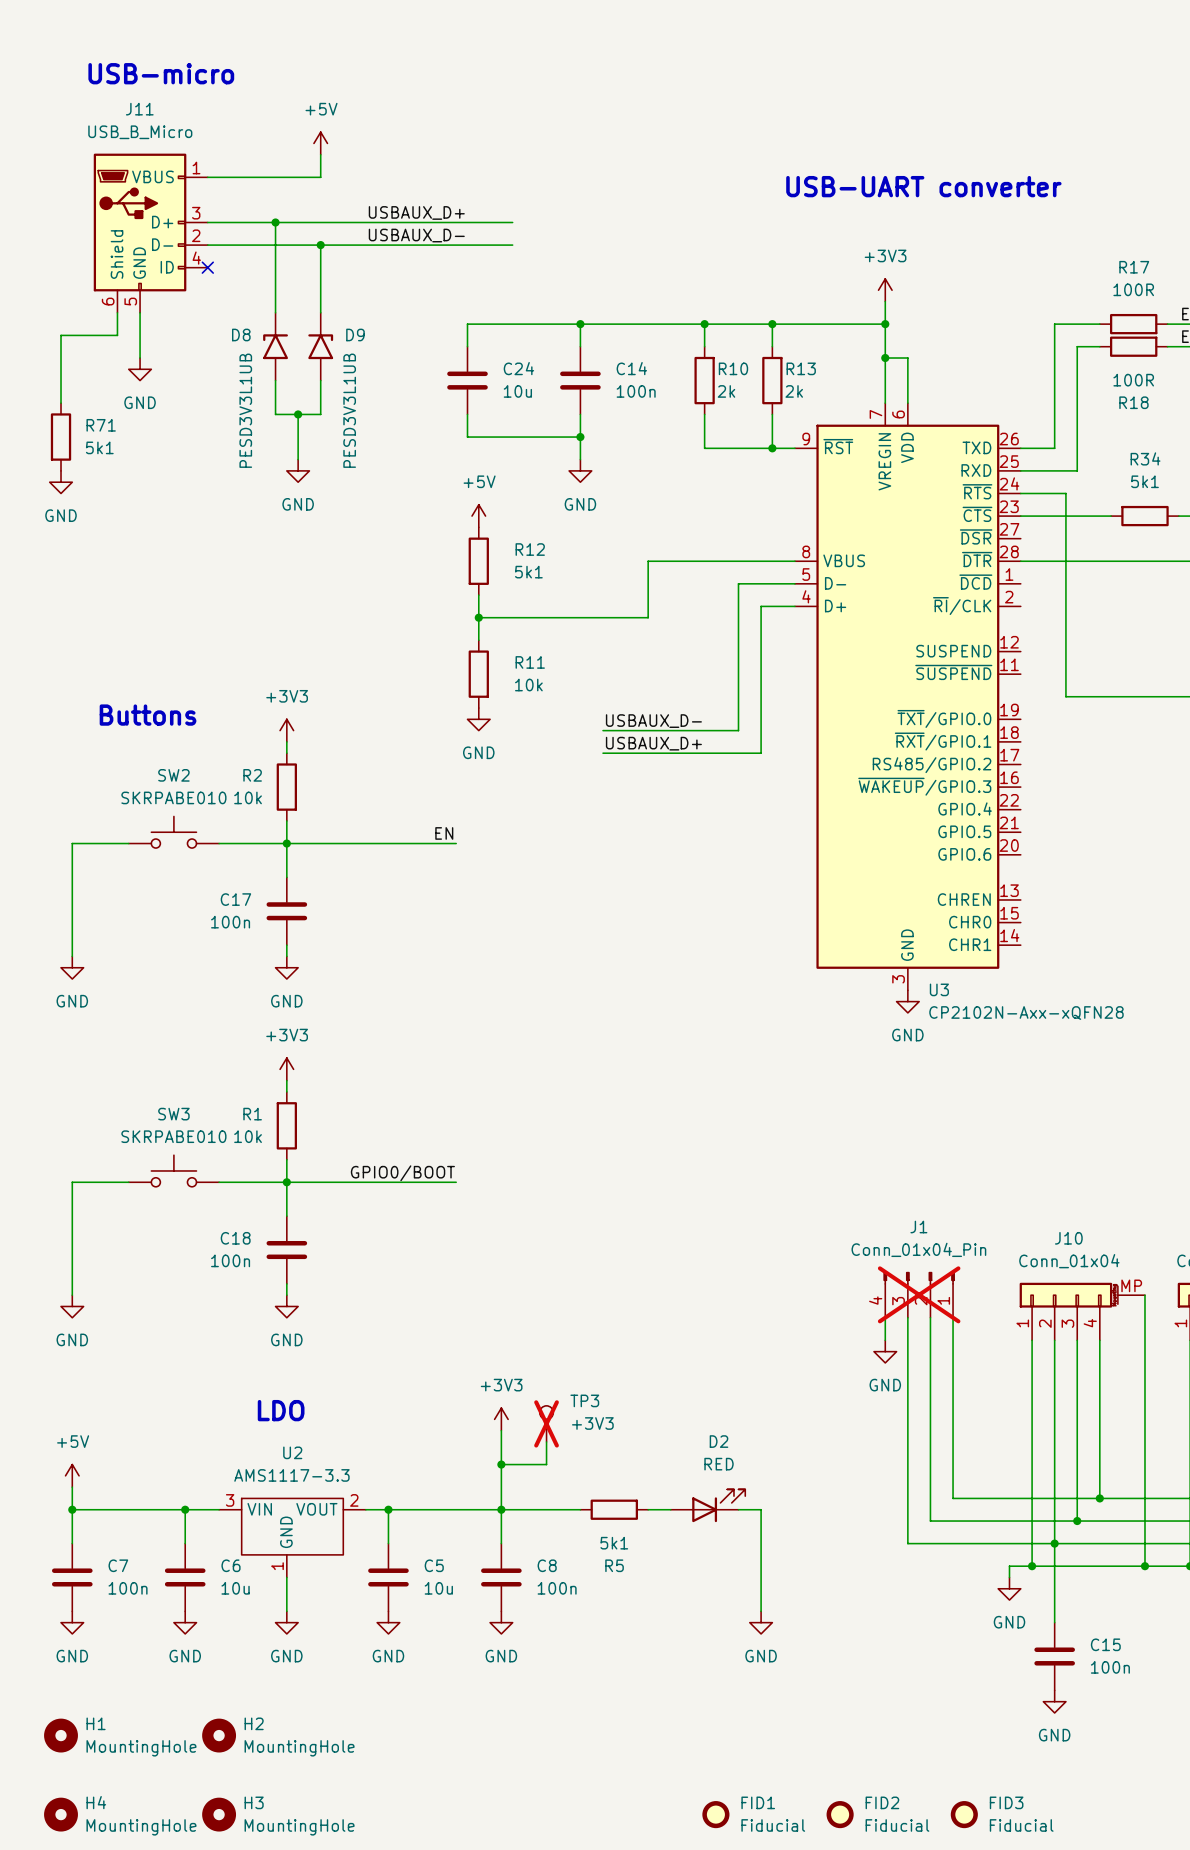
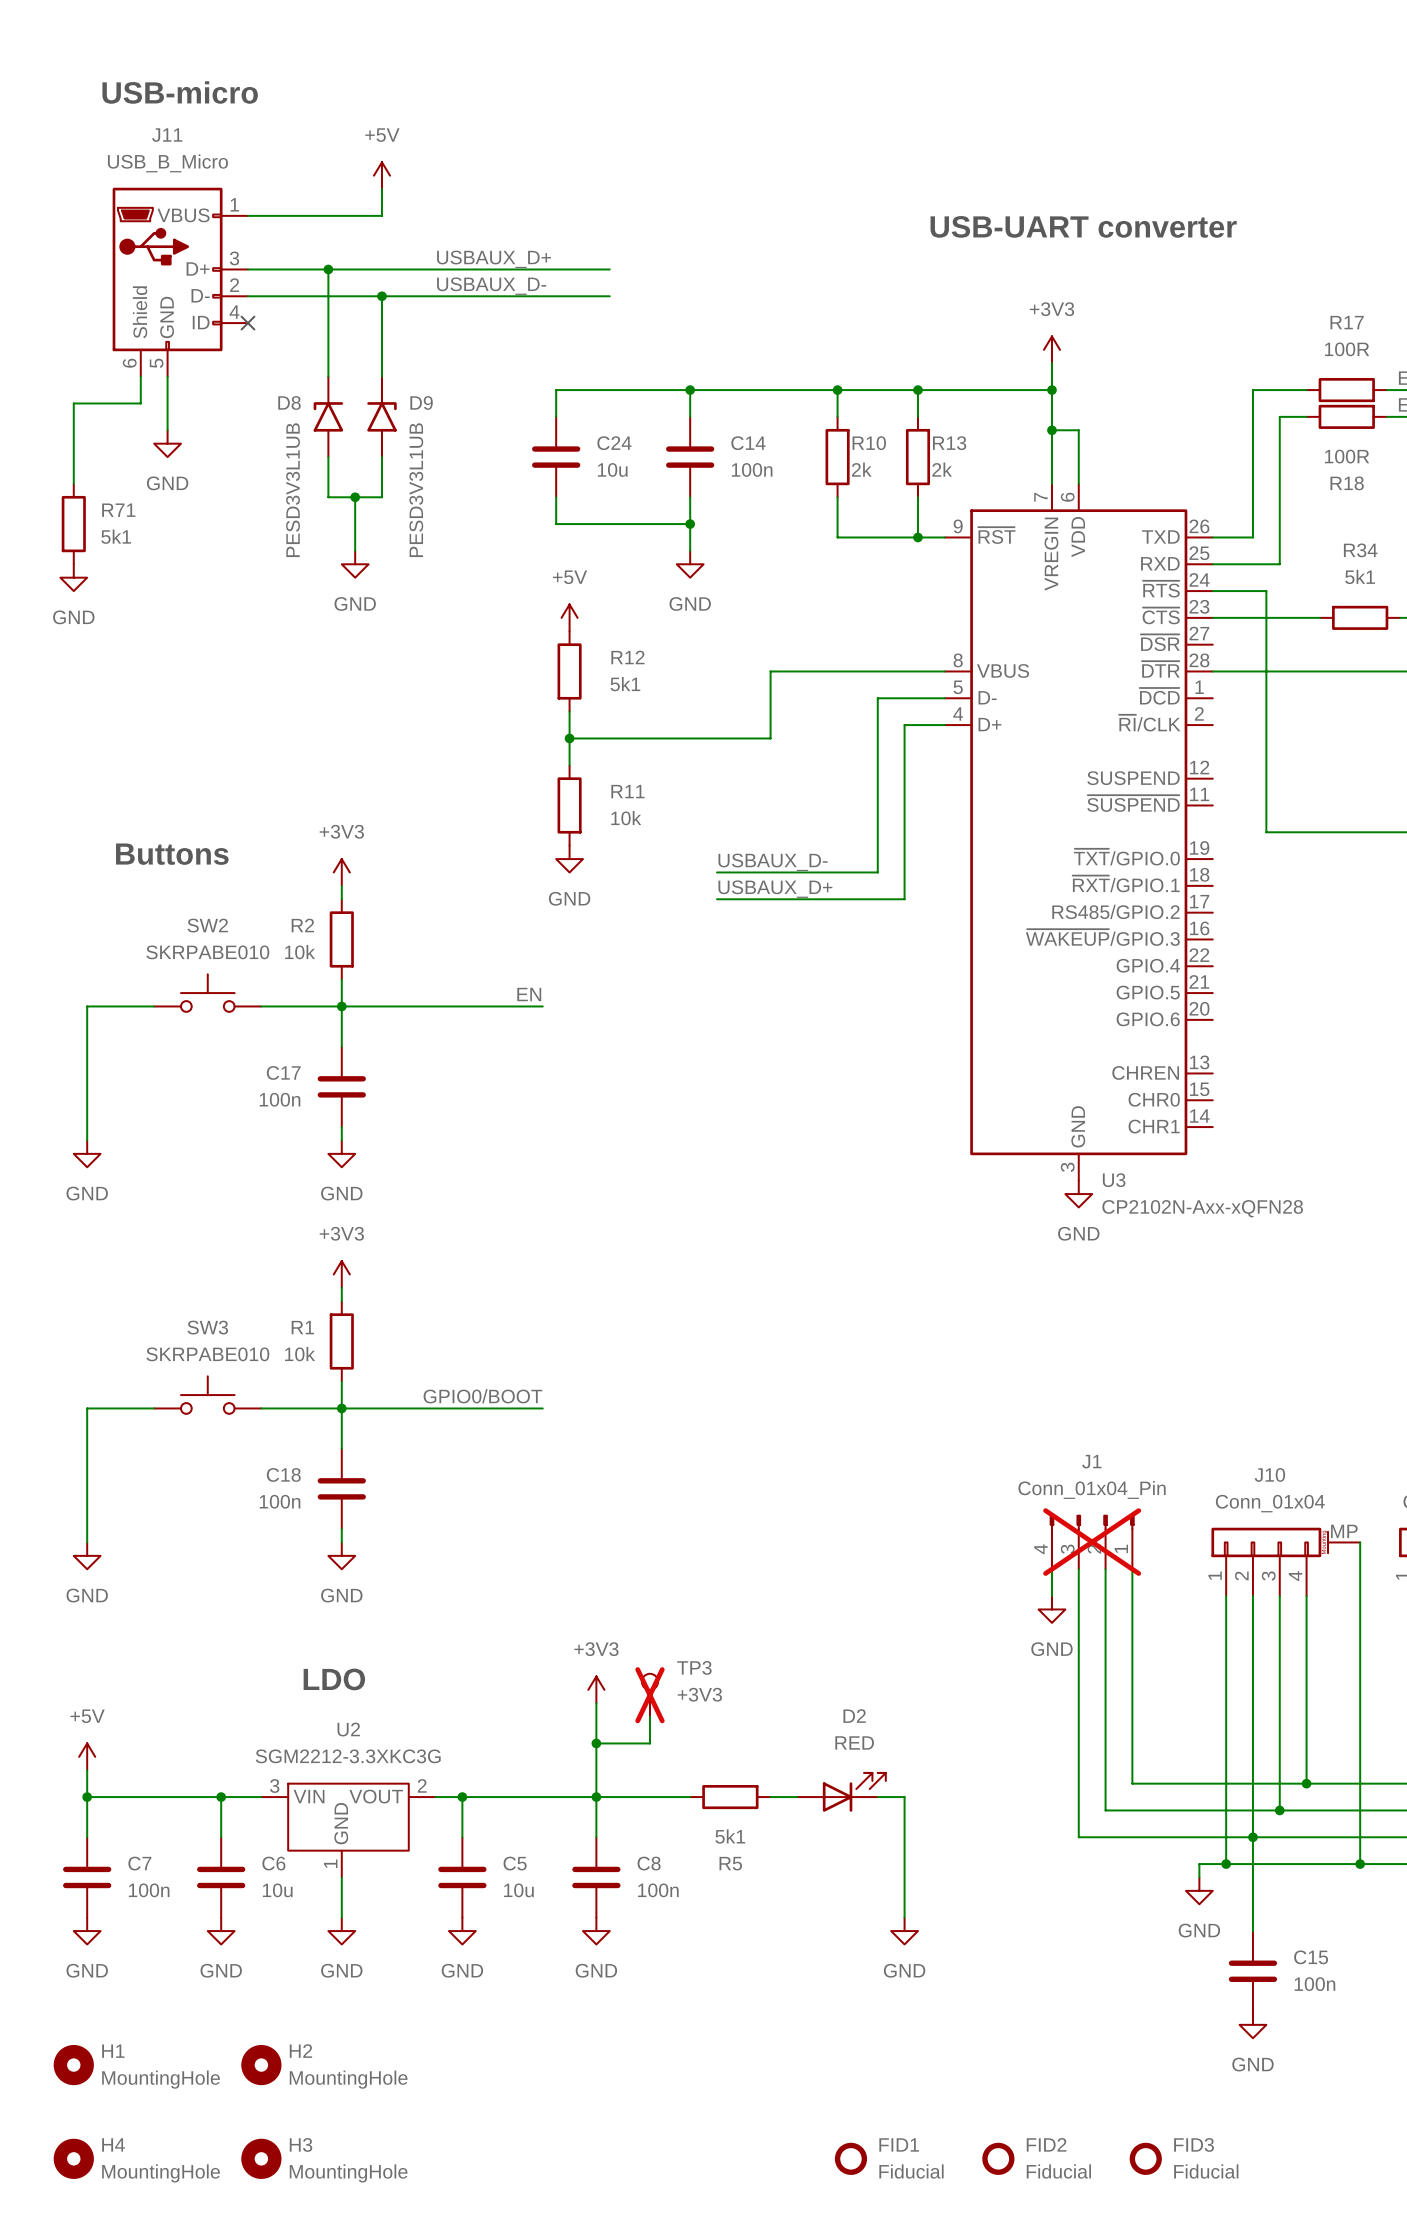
U2 value: AMS1117-3.3 (291, 1475) -> SGM2212-3.3XKC3G (348, 1756)

